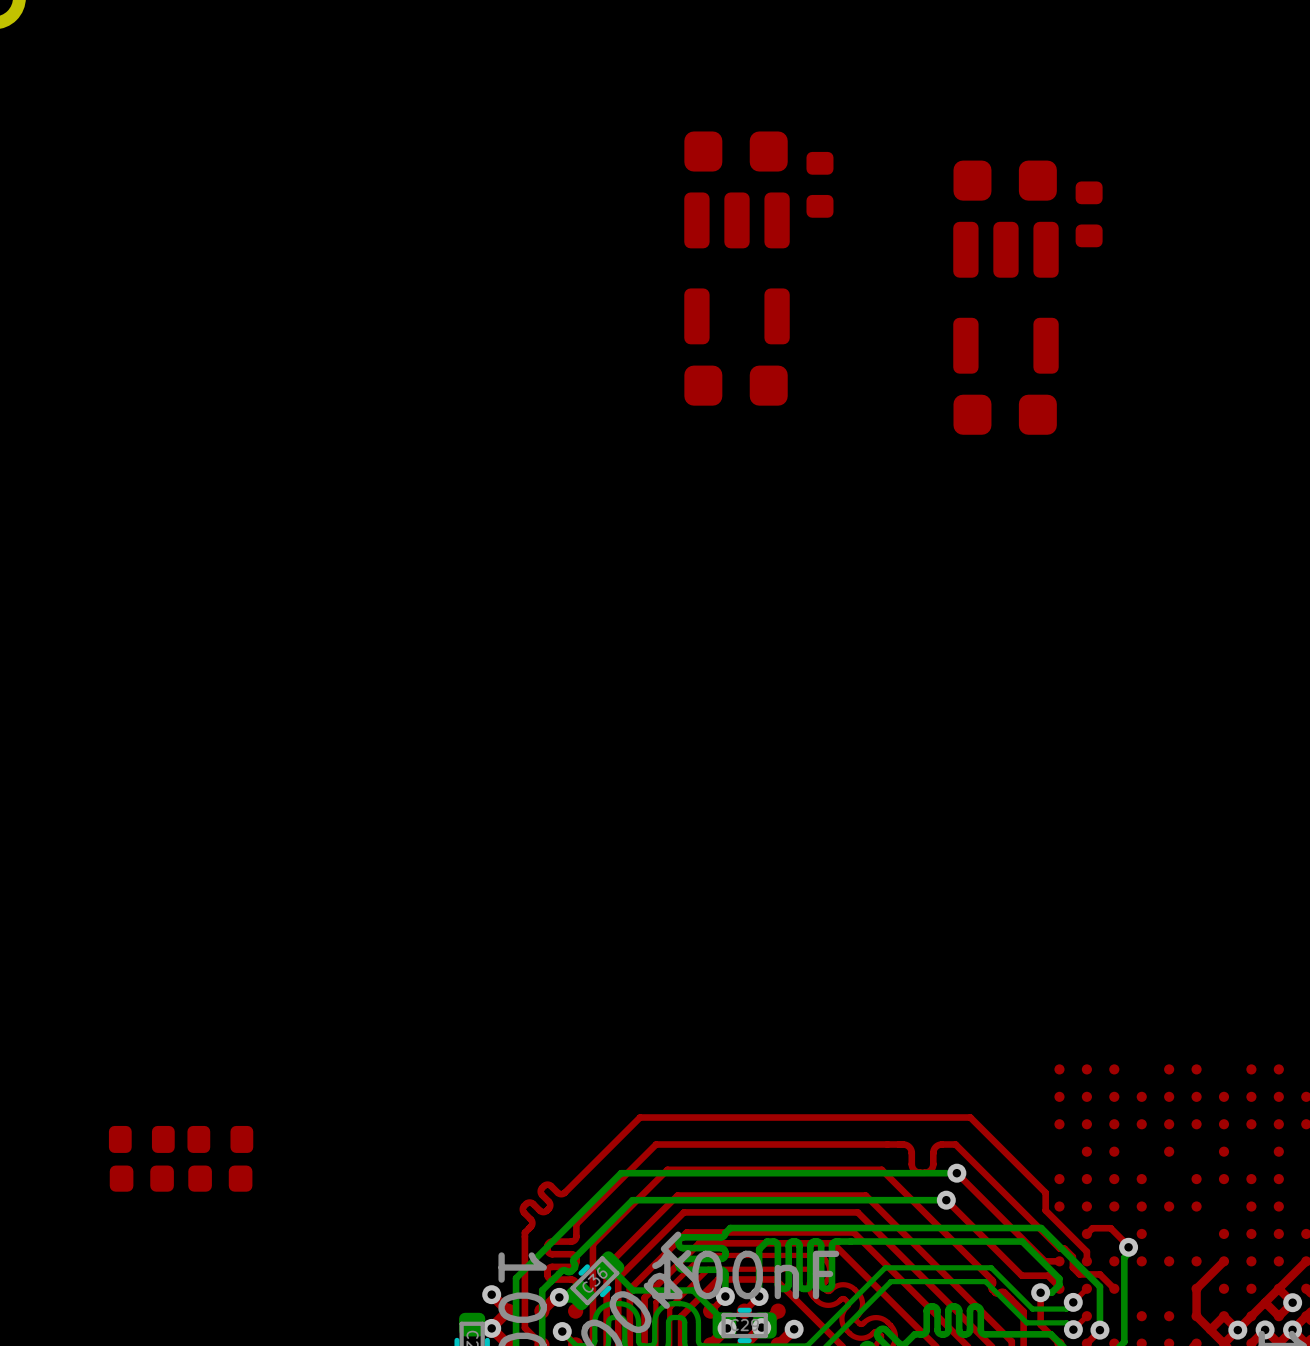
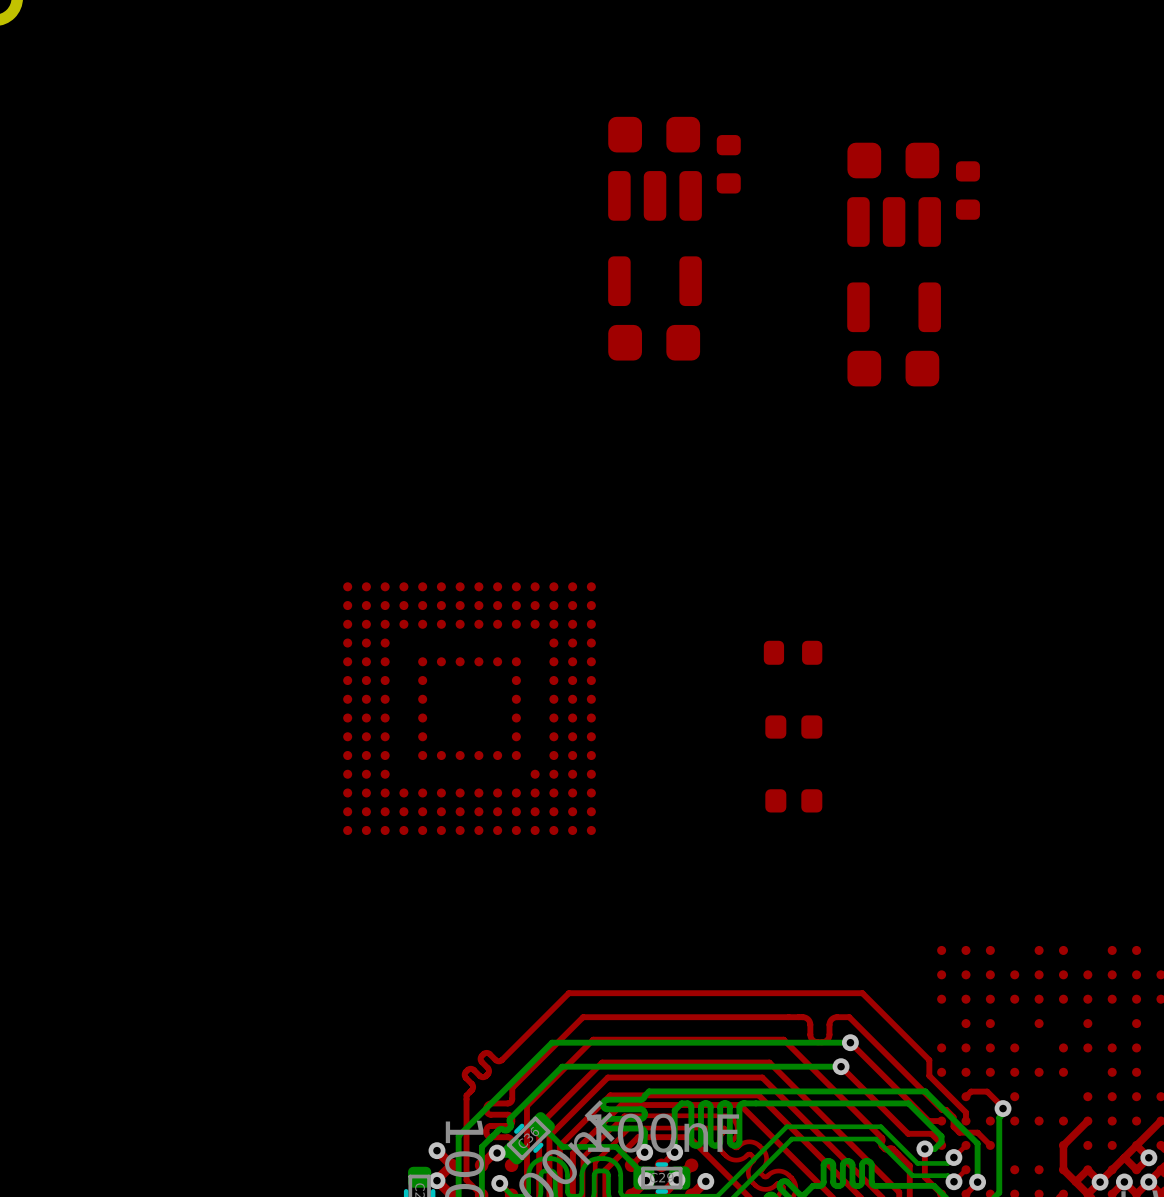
part: none -> (793, 652)
part: none -> (469, 708)
part: none -> (793, 727)
part: none -> (793, 800)
part: (141, 1139) -> none
part: (220, 1139) -> none
part: (141, 1178) -> none
part: (220, 1178) -> none

